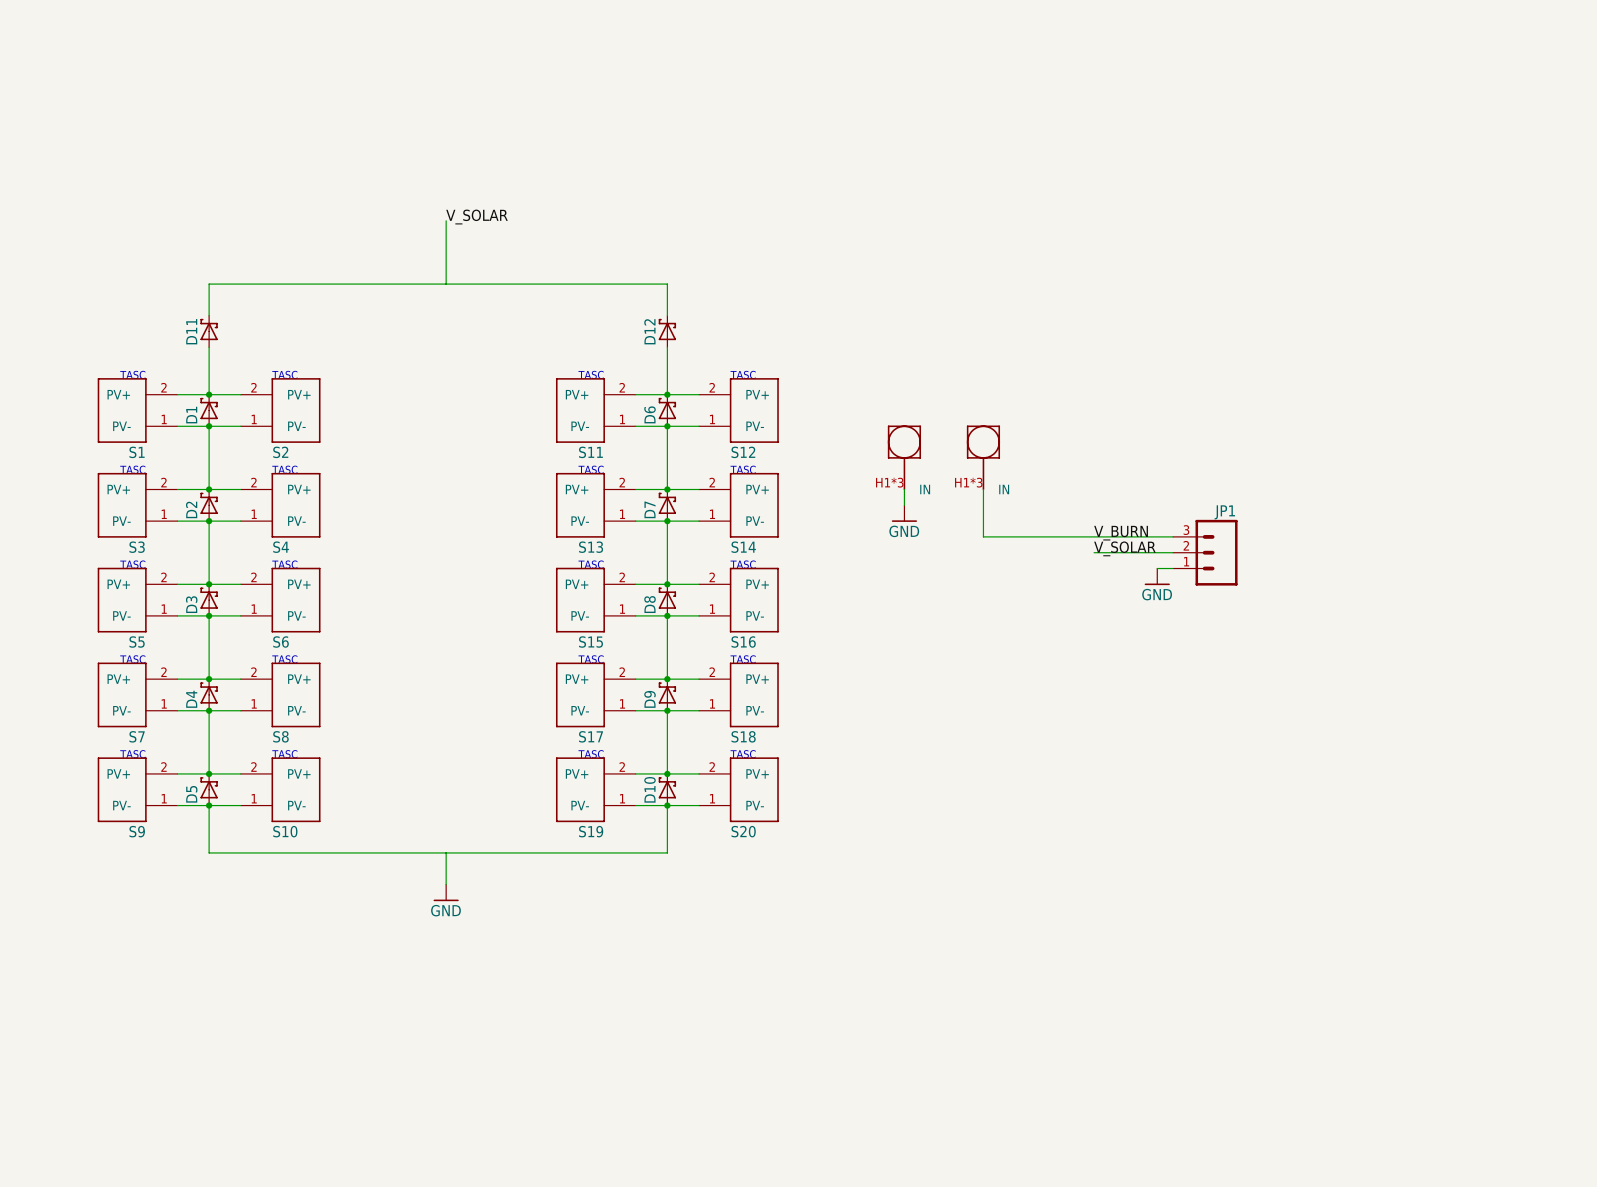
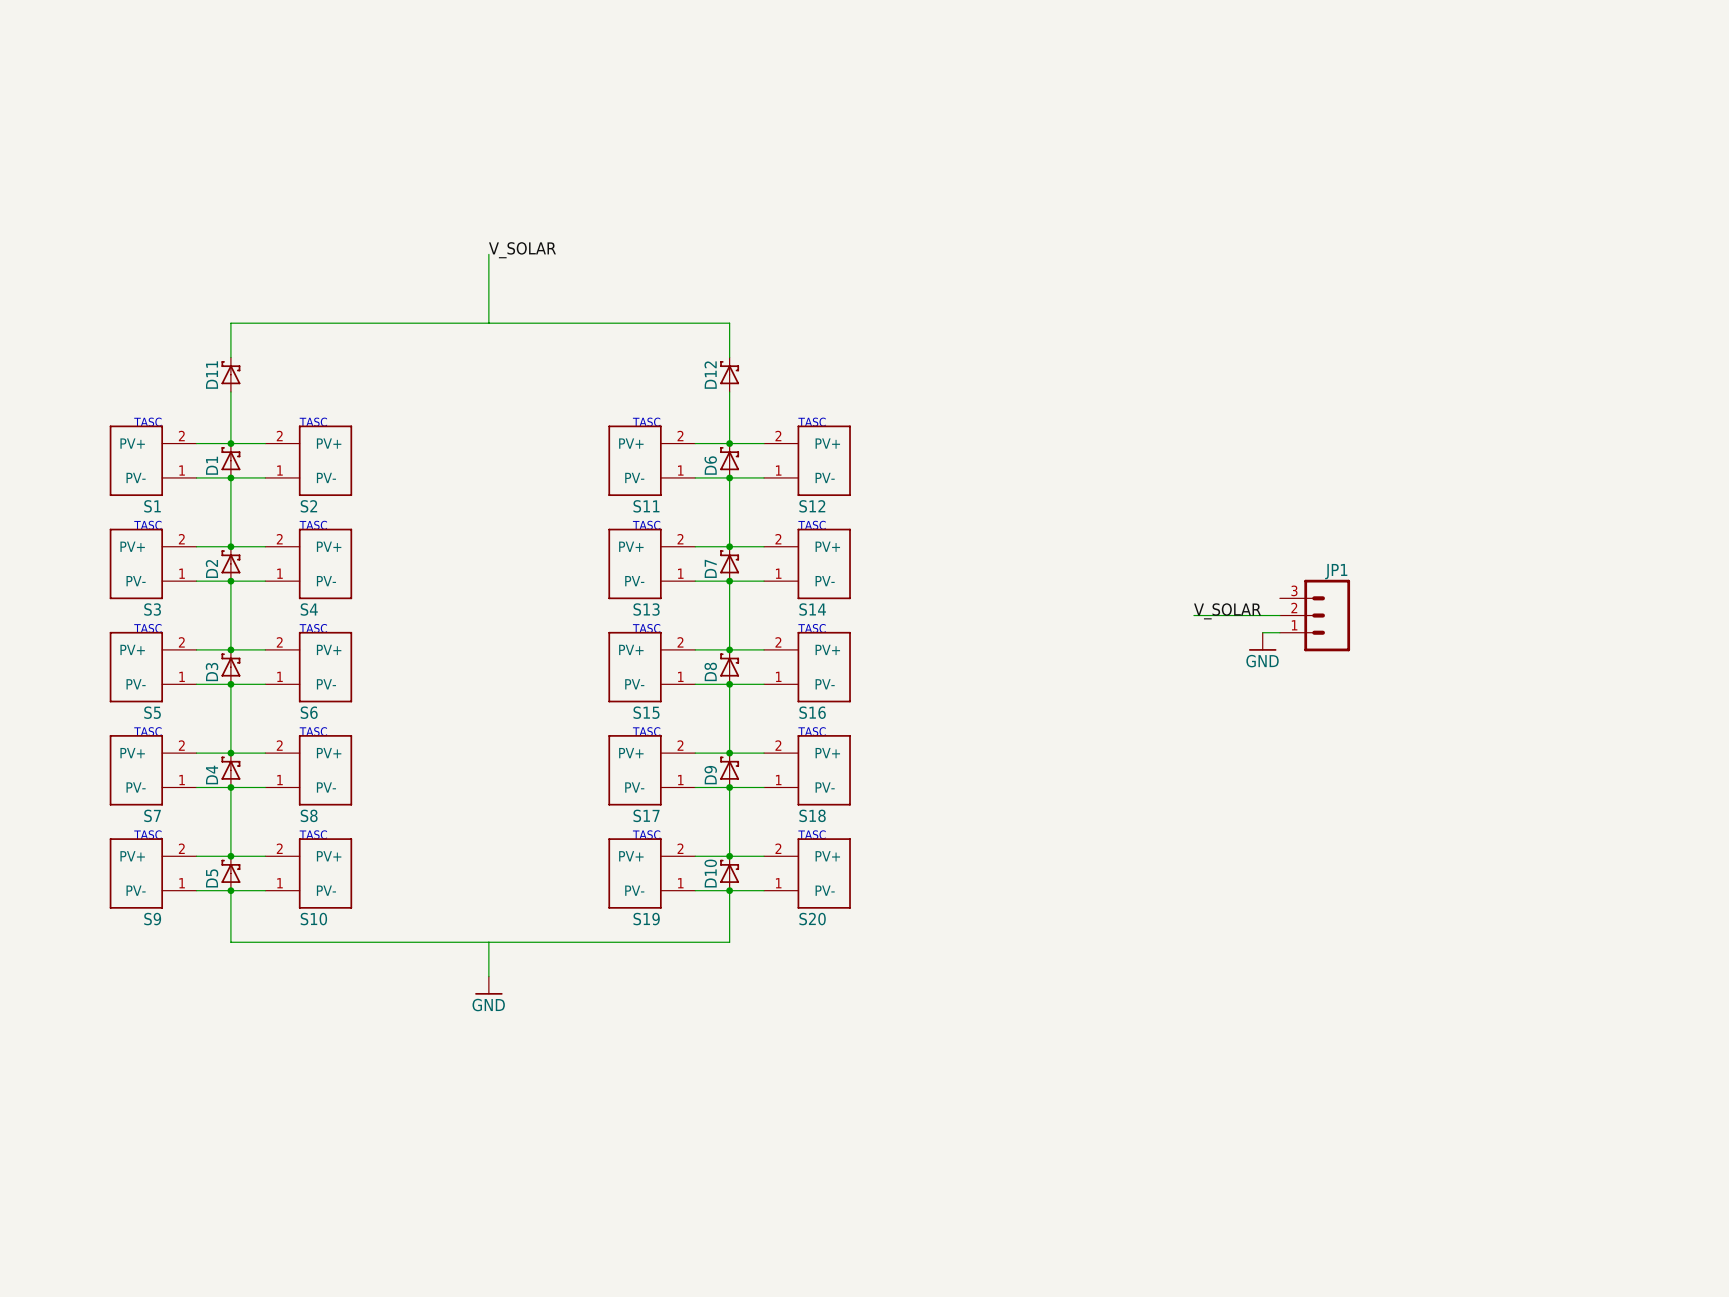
part: (904, 457) -> none
part: (983, 457) -> none
wire: (904, 489) (904, 505) -> none
wire: (983, 489) (983, 536) (1173, 536) -> none
power symbol: GND (904, 513) -> none
label: V_BURN (1121, 533) -> none

